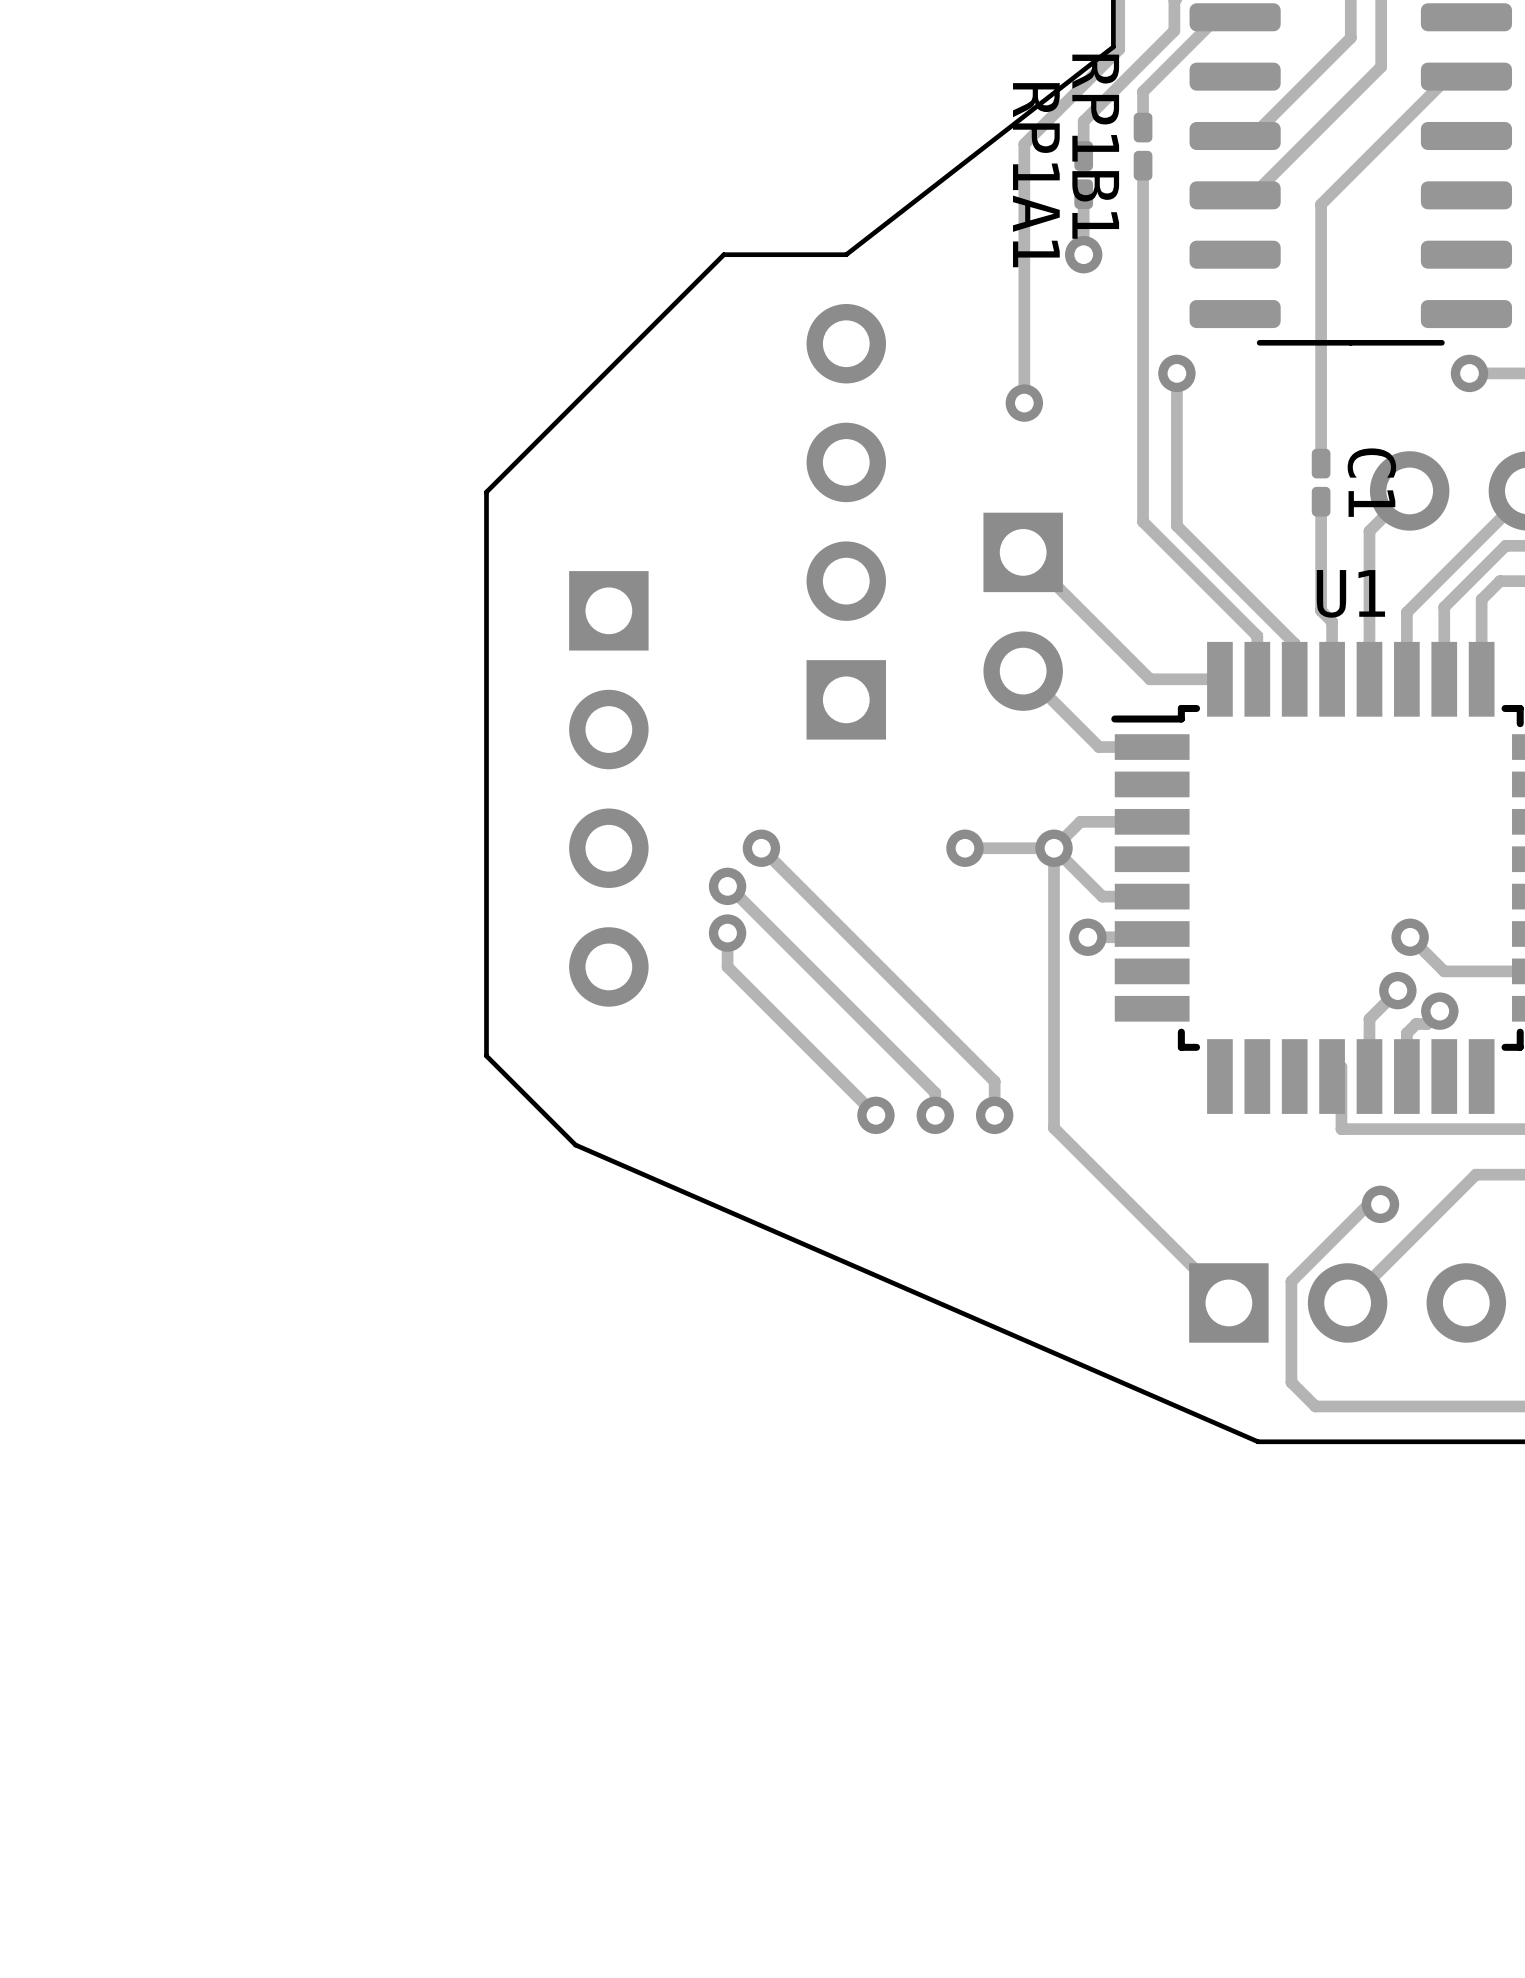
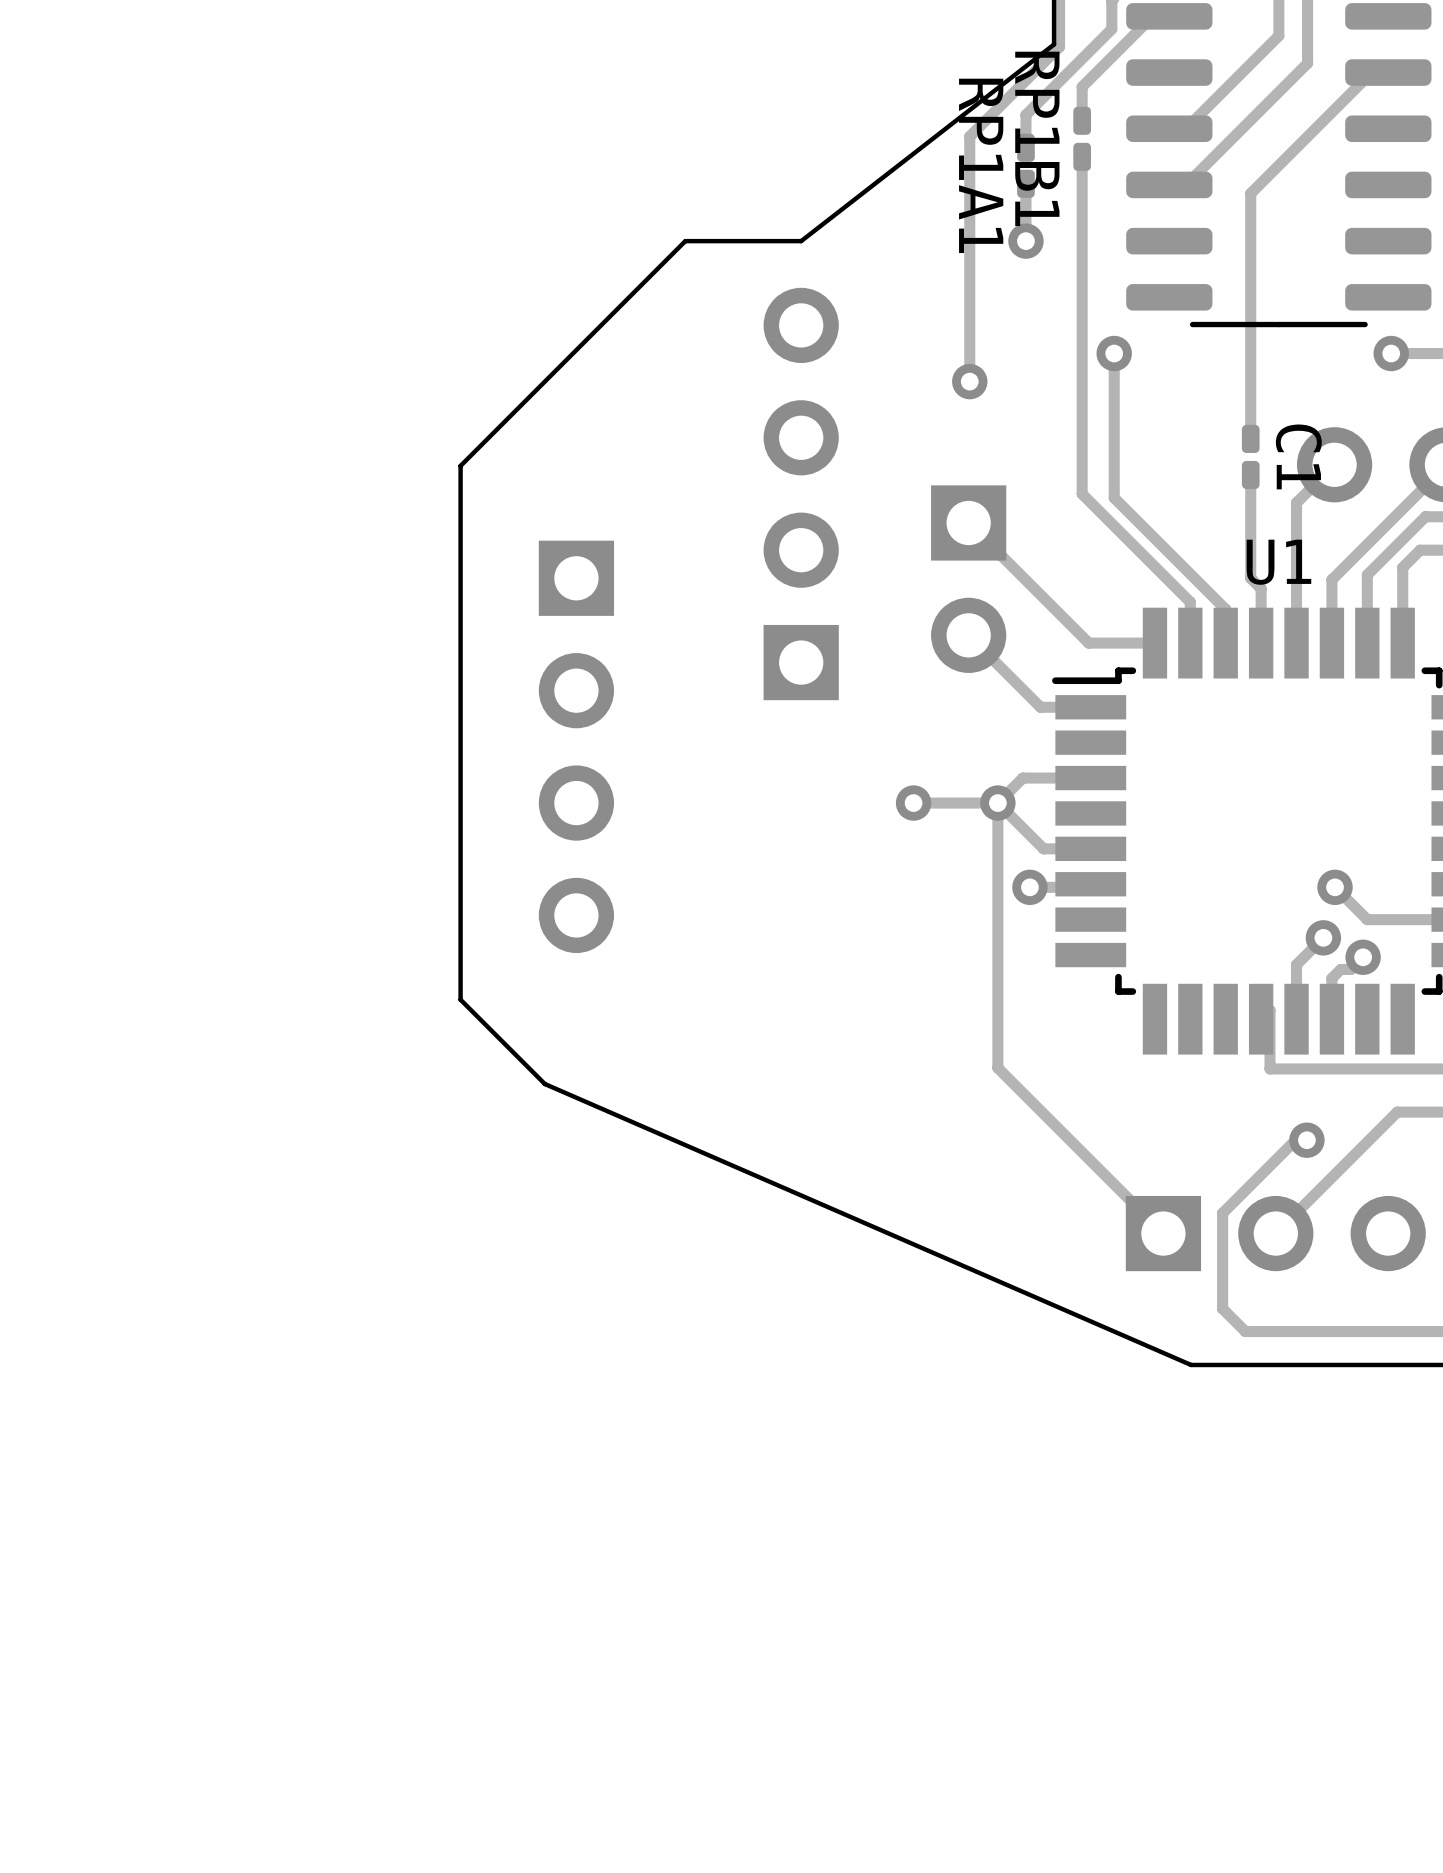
track: (761, 848) (994, 1081) (994, 1115) -> none
via: (761, 848) -> none
track: (727, 886) (935, 1092) (935, 1115) -> none
via: (727, 886) -> none
track: (727, 933) (727, 966) (875, 1115) -> none
via: (727, 933) -> none
via: (875, 1115) -> none
via: (935, 1115) -> none
via: (994, 1115) -> none

